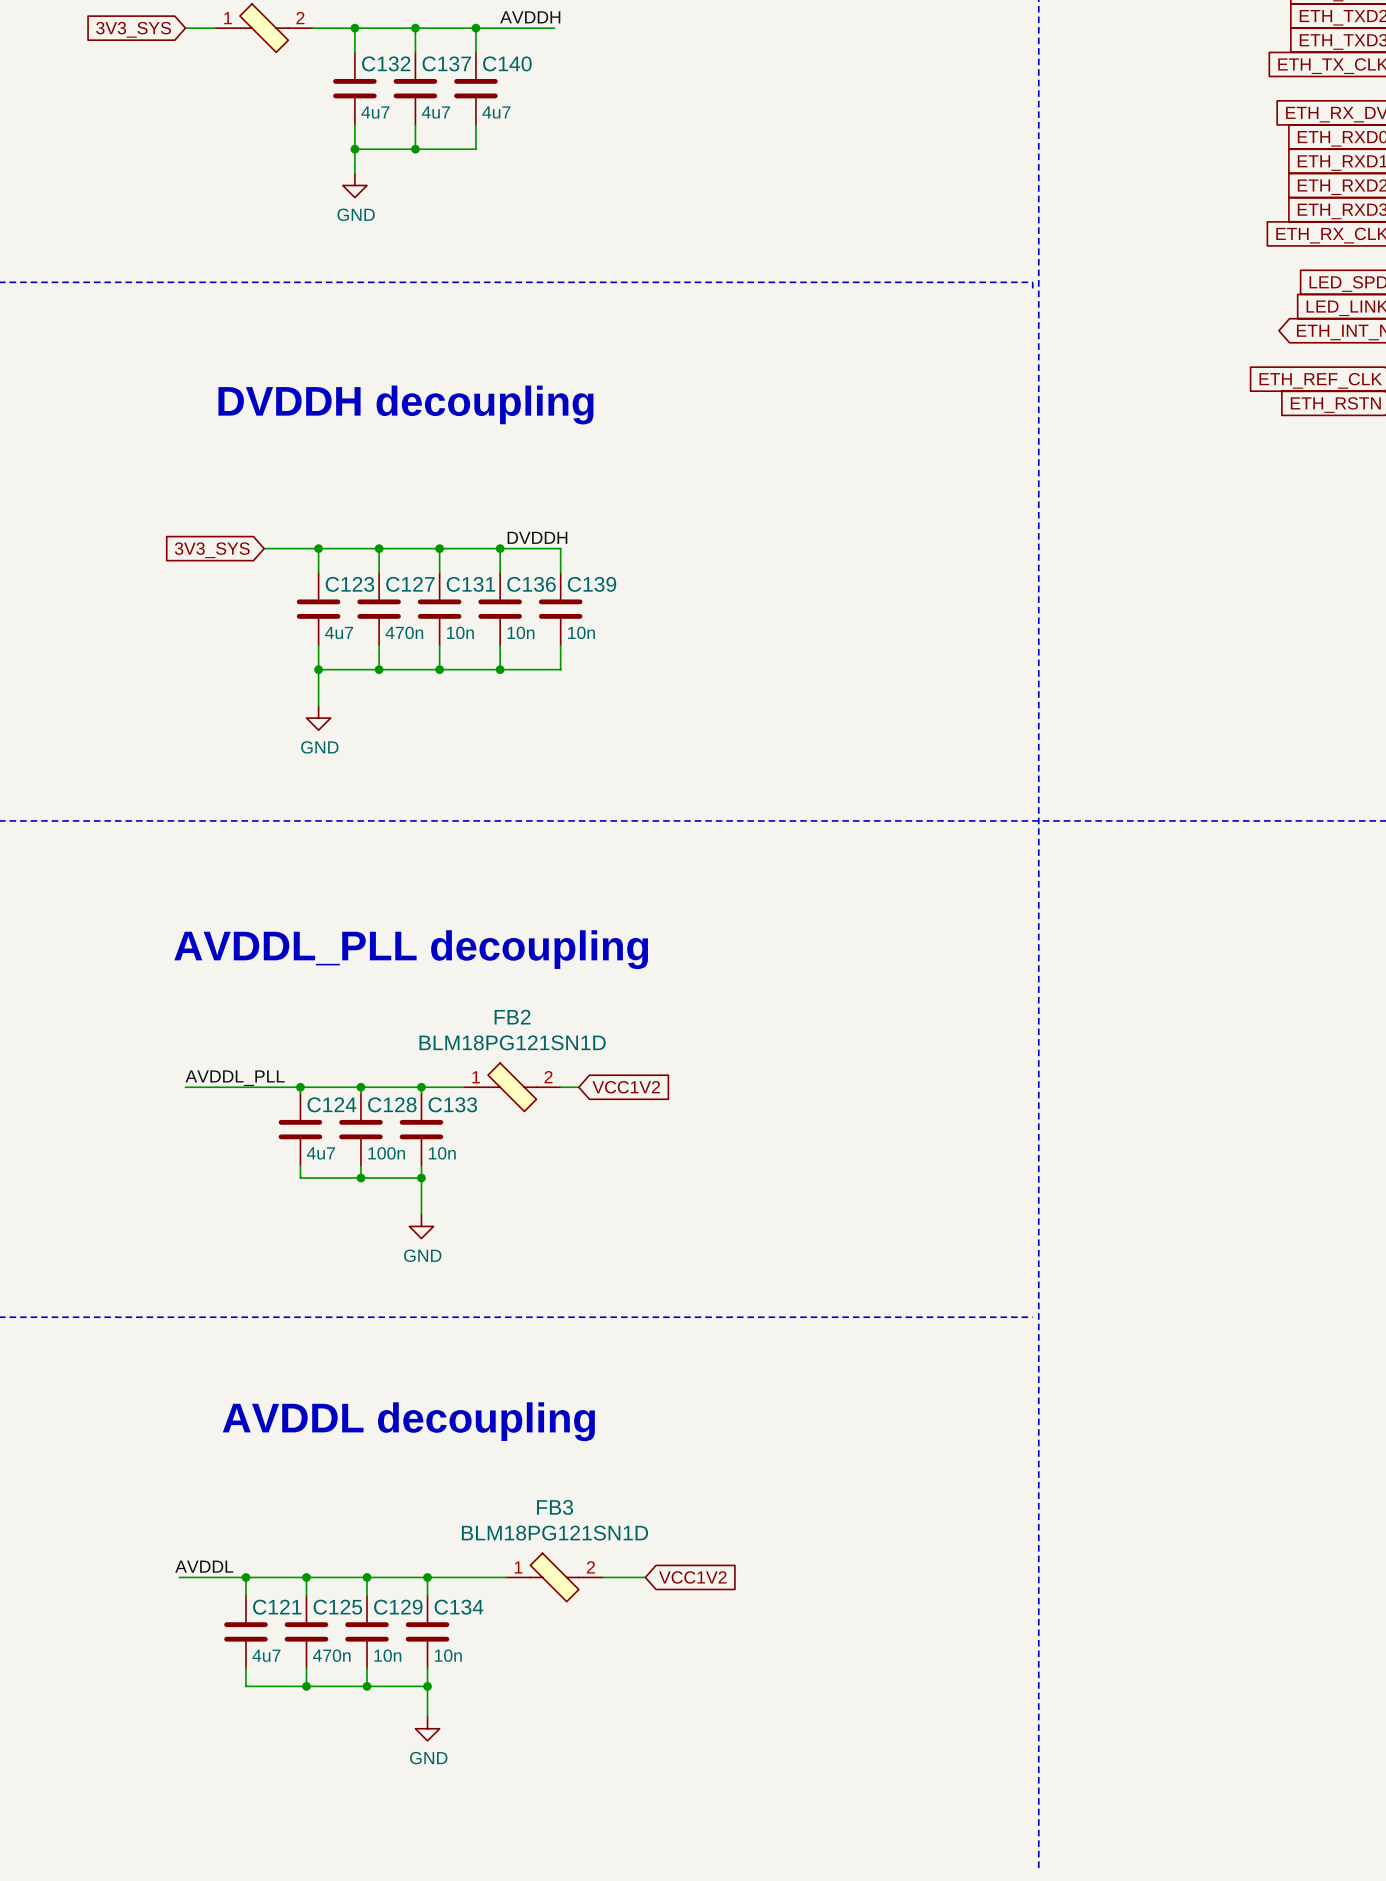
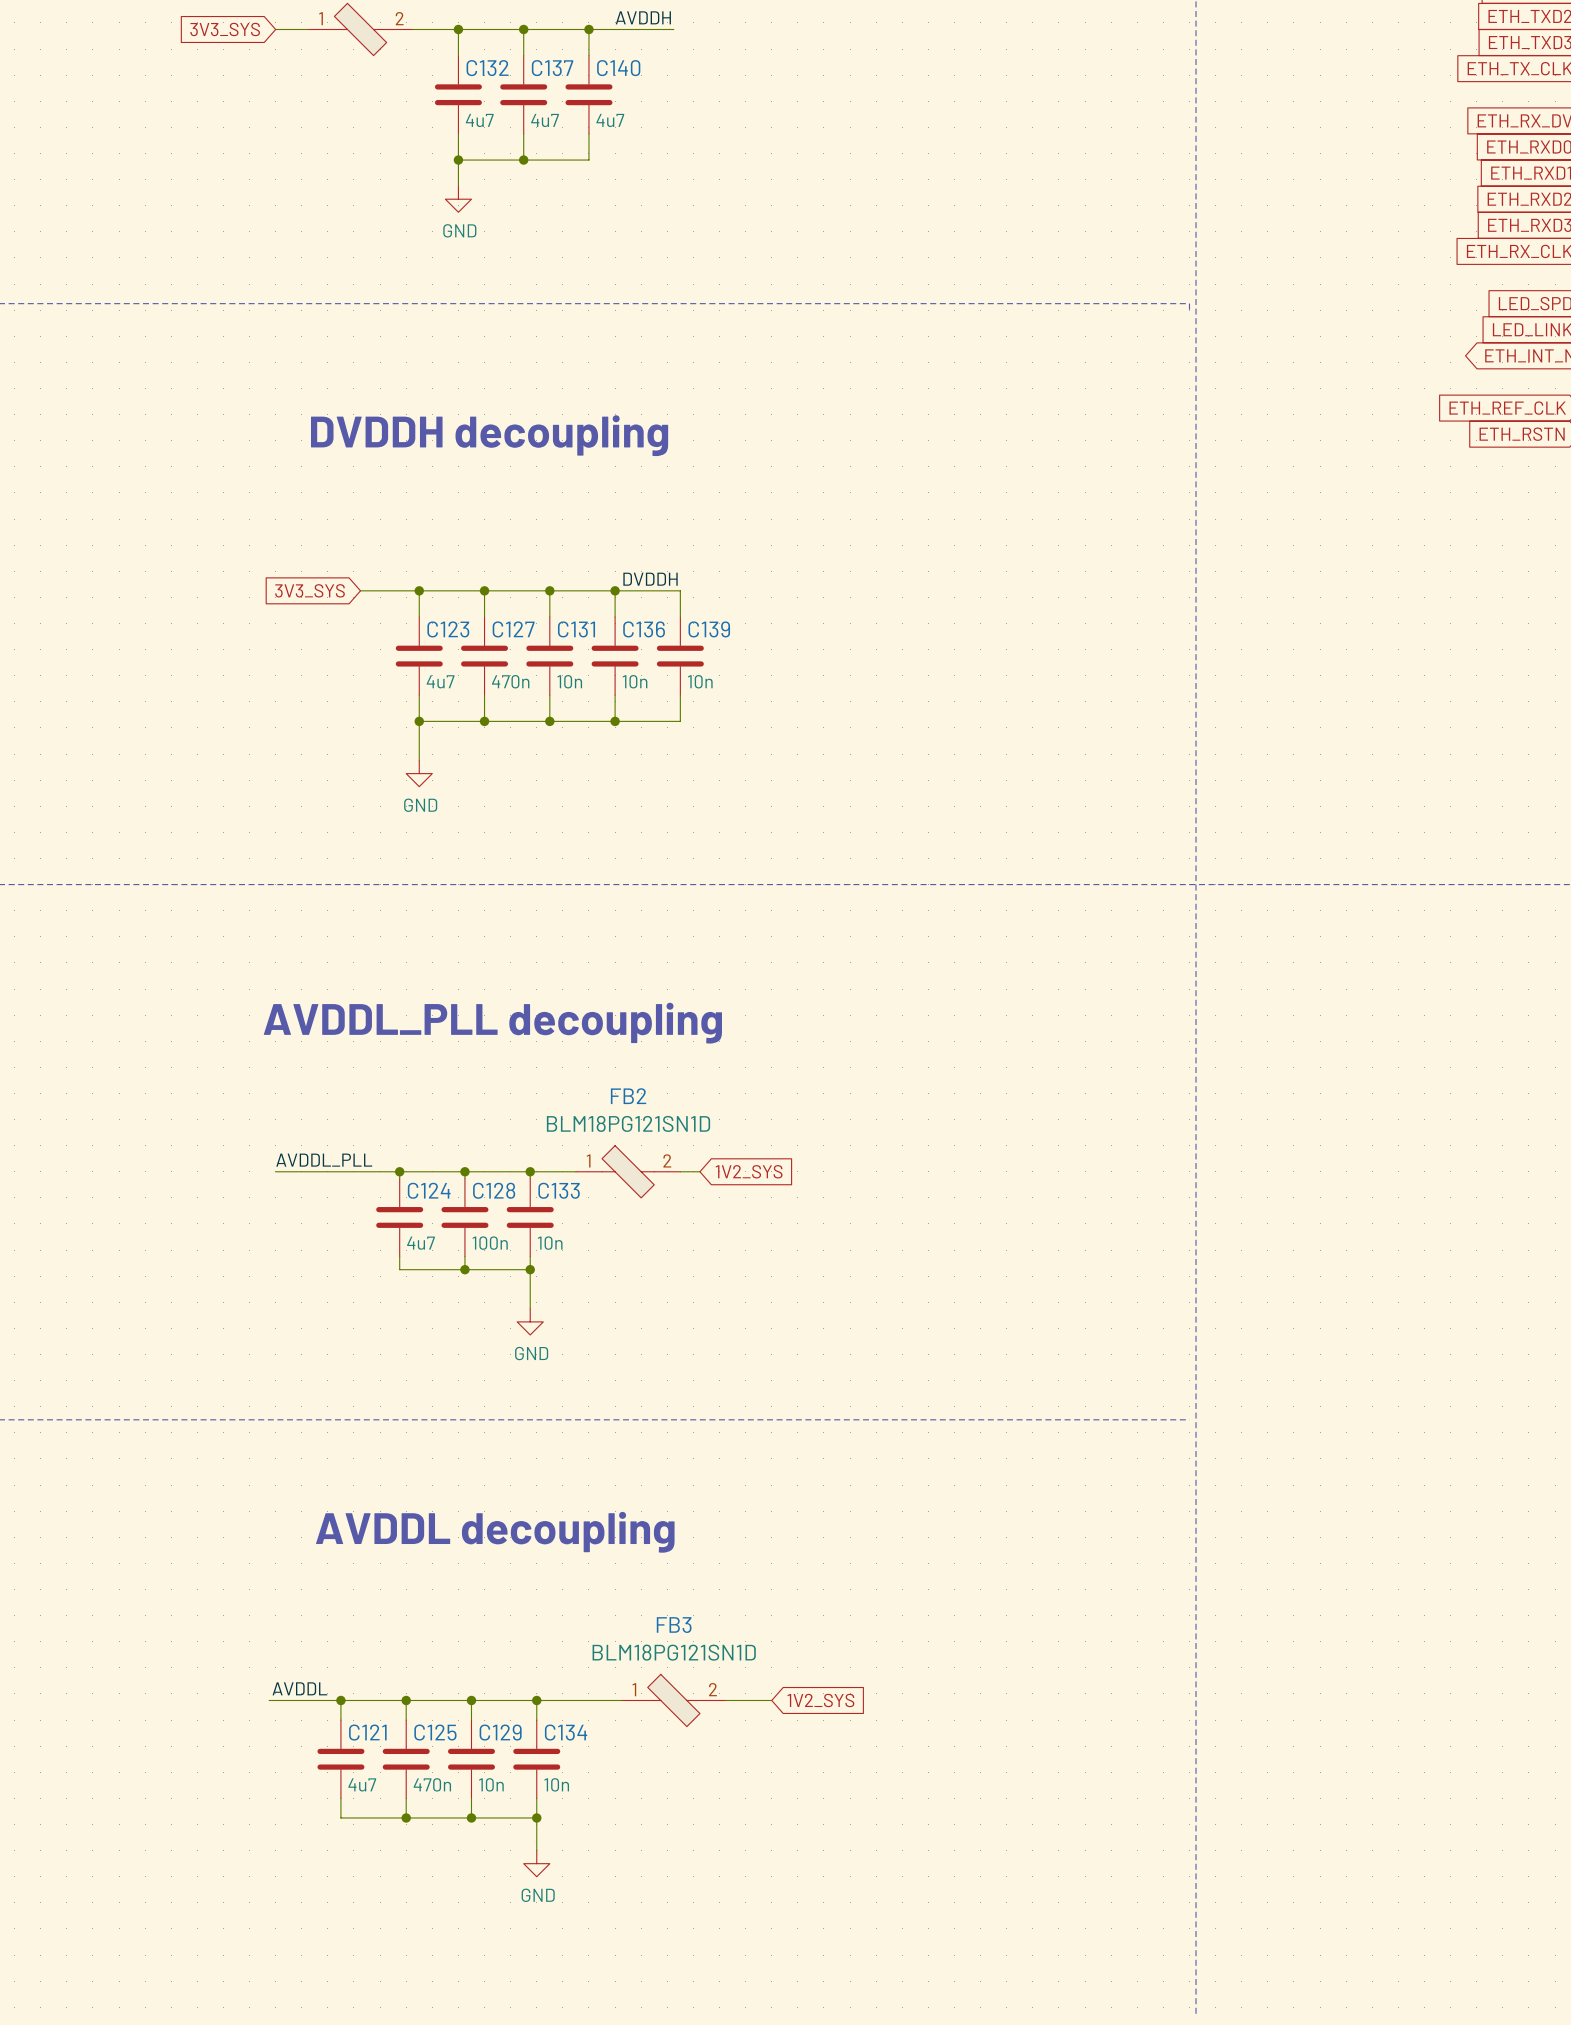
global label: VCC1V2 (626, 1087) -> 1V2_SYS (749, 1171)
global label: VCC1V2 (692, 1577) -> 1V2_SYS (820, 1700)

